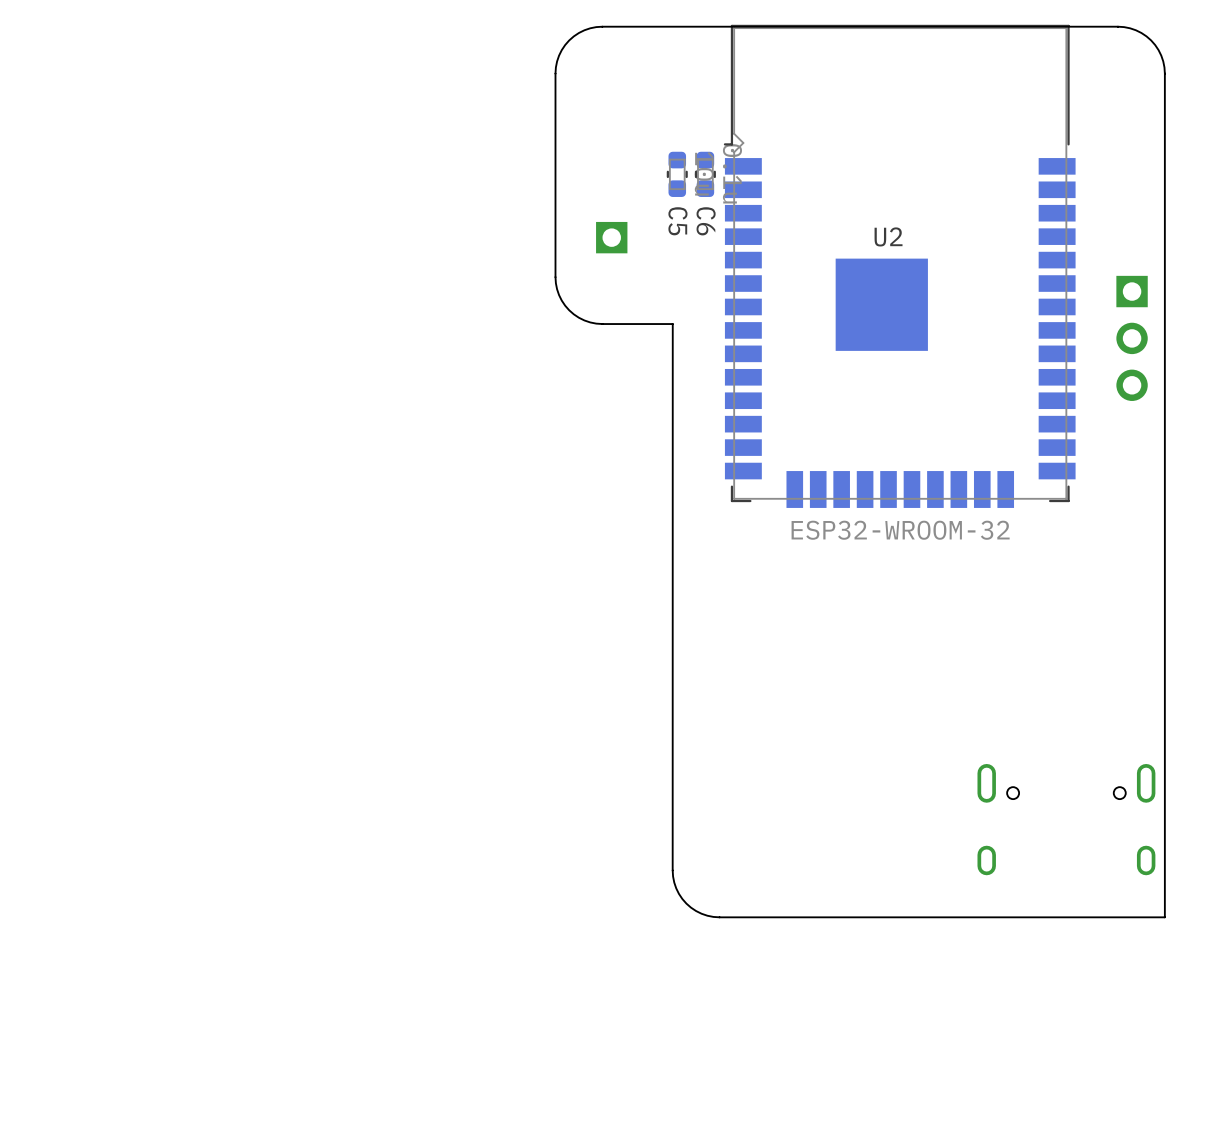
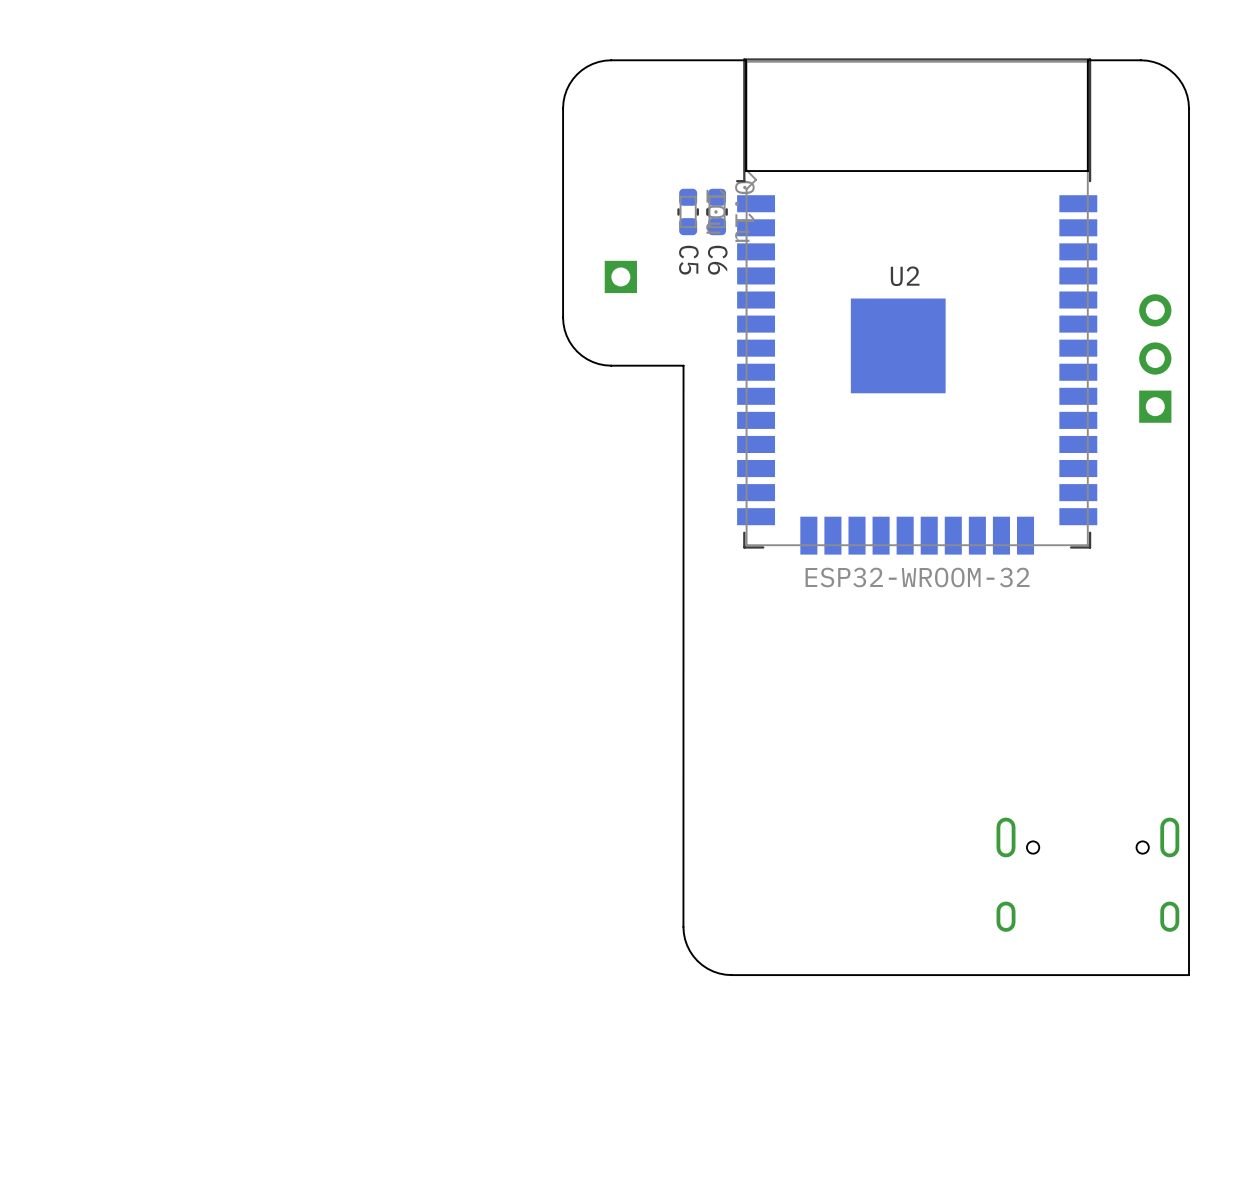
board edge: (1066, 26) (733, 26) -> (1087, 60) (1087, 171) (746, 171) (746, 60)
part rotation: 0° (1132, 338) -> 180° (1155, 358)

